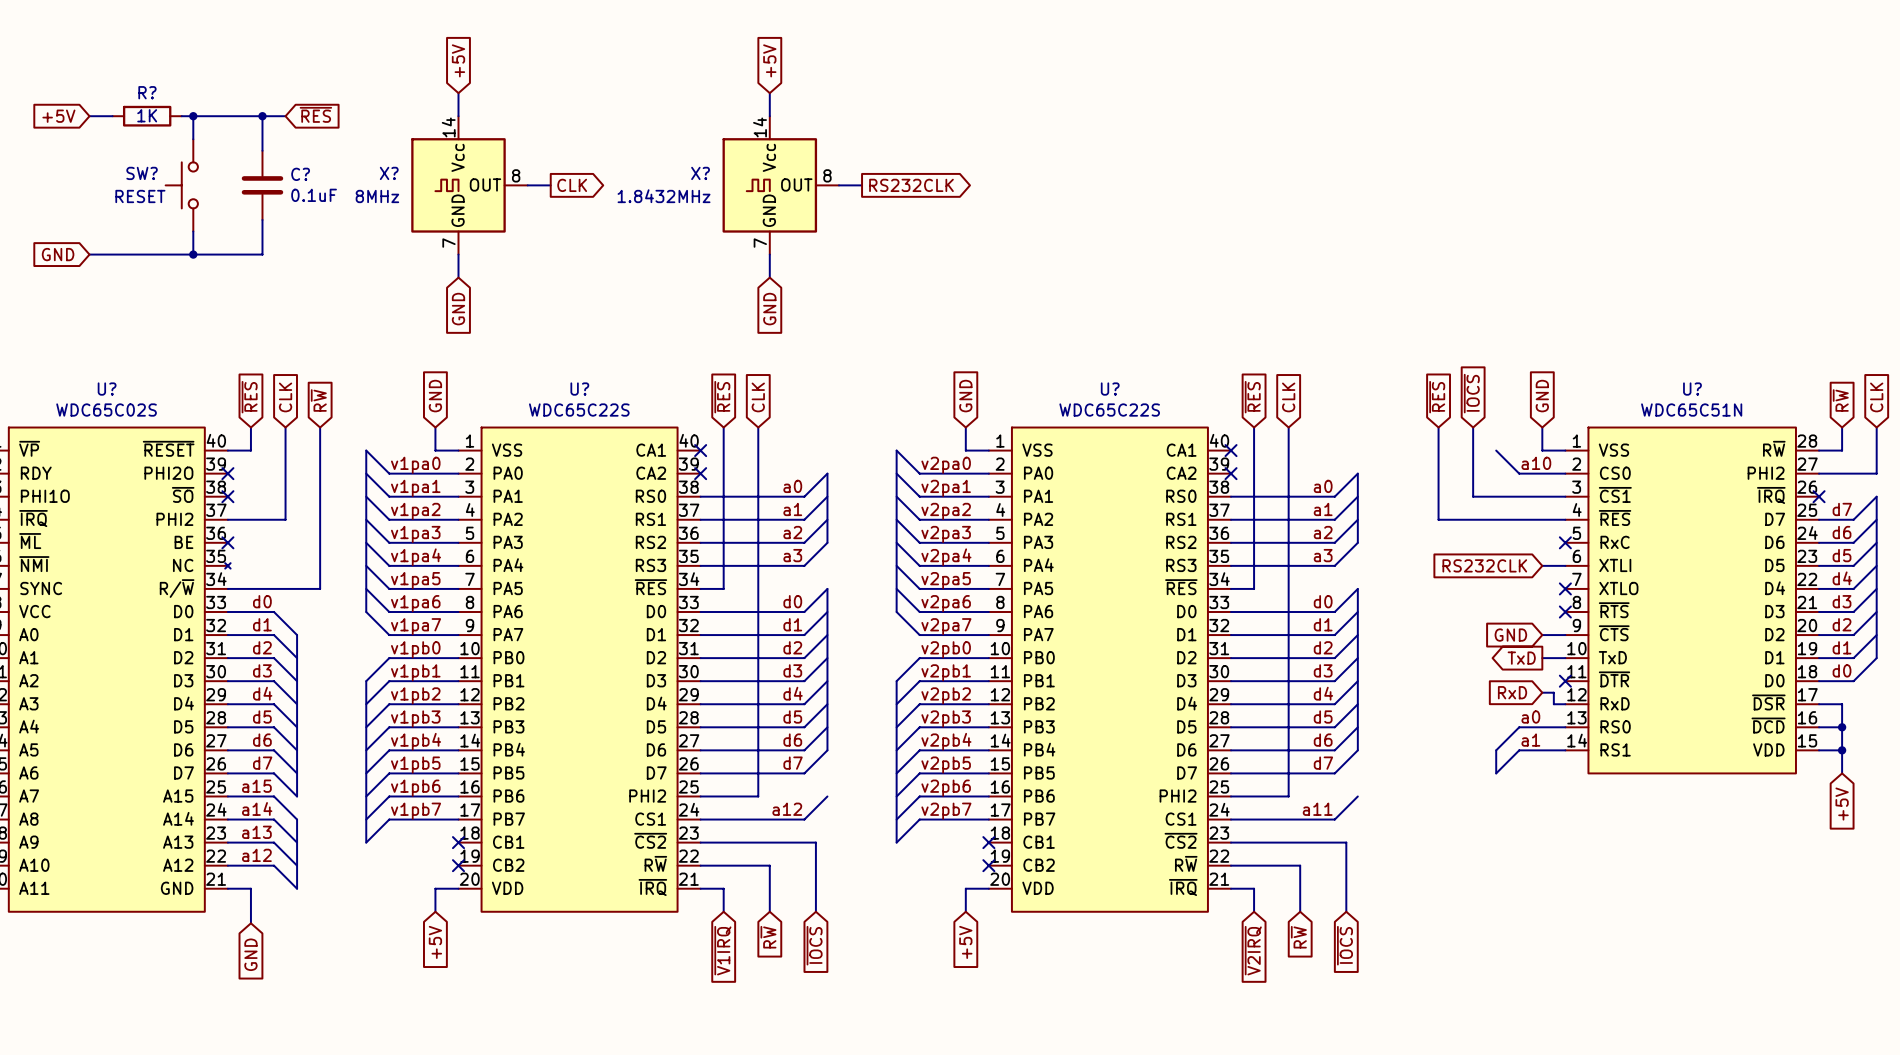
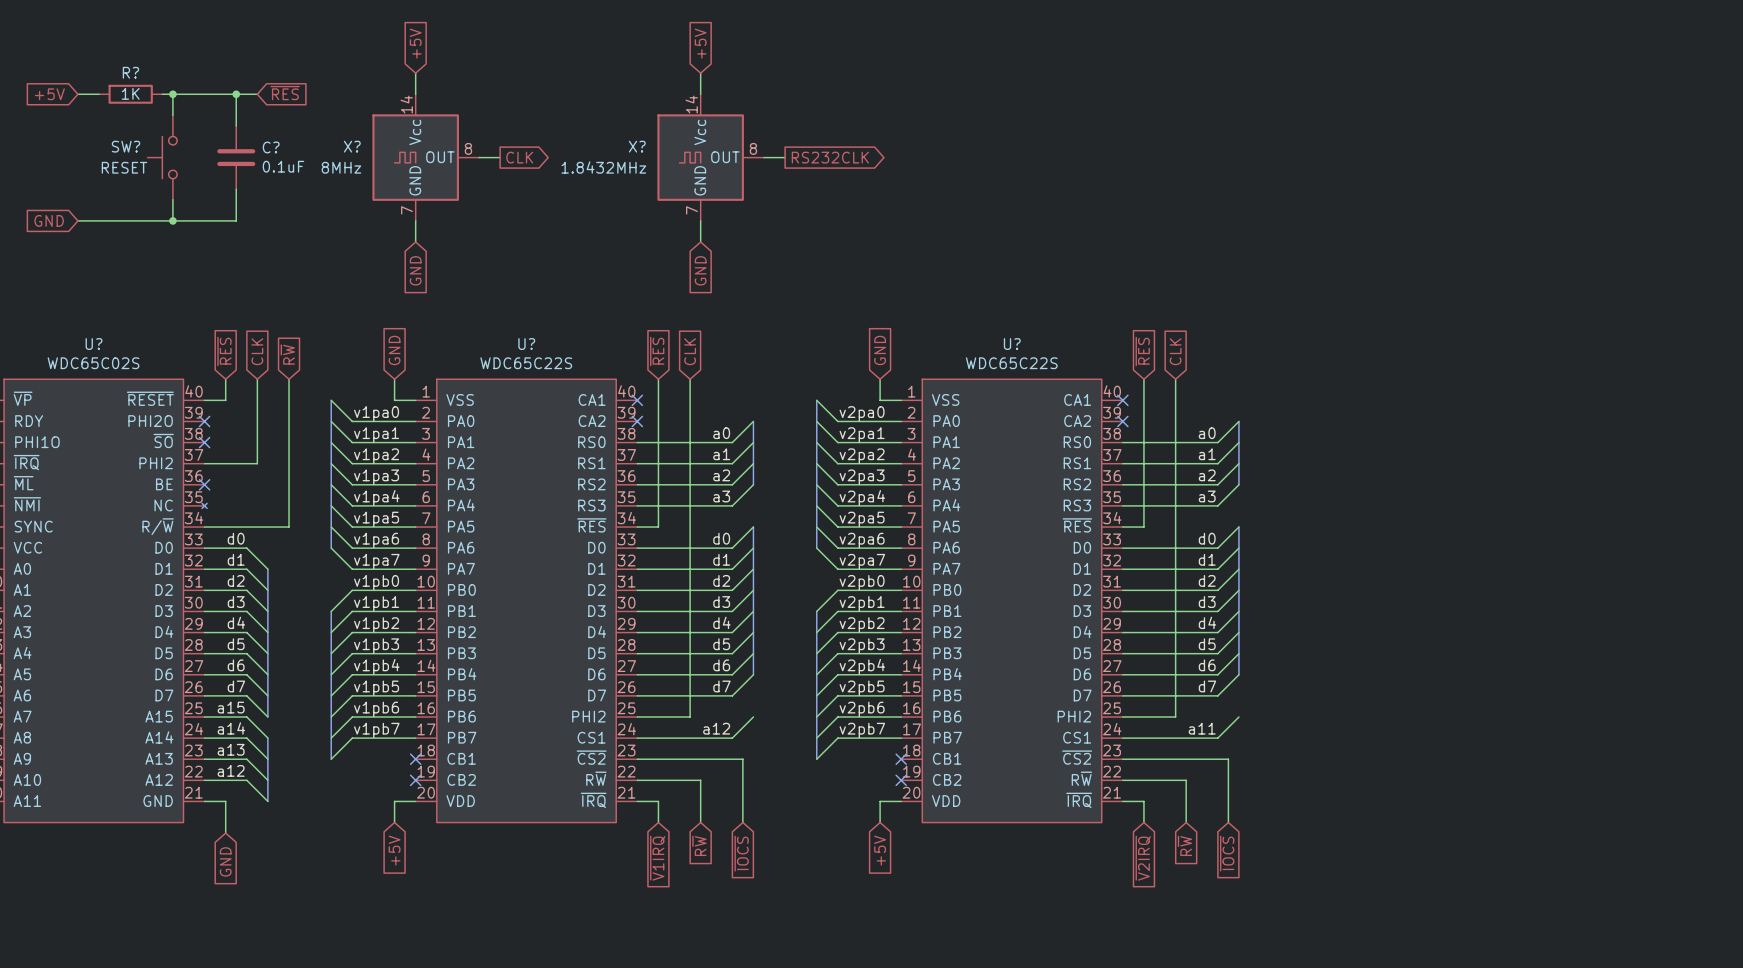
global label: ~{IOCS} (1471, 393) -> none
global label: GND (1542, 396) -> none
global label: ~{RES} (1437, 397) -> none
global label: CLK (1876, 397) -> none
global label: R~{W} (1840, 400) -> none
wire: (1438, 427) (1438, 519) (1565, 519) -> none
wire: (1473, 427) (1473, 496) (1565, 496) -> none
wire: (1542, 427) (1542, 450) (1565, 450) -> none
wire: (1842, 427) (1842, 450) (1819, 450) -> none
wire: (1876, 427) (1876, 473) (1819, 473) -> none
wire: (1496, 450) (1519, 473) (1565, 473) -> none
label: a10 (1536, 463) -> none
no-connect mark: (1819, 496) -> none
wire: (1876, 496) (1853, 519) (1819, 519) -> none
bus: (1876, 496) (1876, 658) -> none
label: d7 (1842, 509) -> none
wire: (1876, 519) (1853, 542) (1819, 542) -> none
label: d6 (1842, 532) -> none
no-connect mark: (1565, 542) -> none
wire: (1876, 542) (1853, 565) (1819, 565) -> none
label: d5 (1842, 555) -> none
global label: RS232CLK (1484, 565) -> none
wire: (1542, 565) (1565, 565) -> none
wire: (1876, 565) (1853, 588) (1819, 588) -> none
label: d4 (1842, 578) -> none
no-connect mark: (1565, 588) -> none
wire: (1876, 588) (1853, 611) (1819, 611) -> none
U?: WDC65C51N (1692, 600) -> none
label: d3 (1842, 601) -> none
no-connect mark: (1565, 611) -> none
wire: (1876, 611) (1853, 635) (1819, 635) -> none
label: d2 (1842, 624) -> none
global label: GND (1510, 635) -> none
wire: (1542, 635) (1565, 635) -> none
wire: (1876, 635) (1853, 658) (1819, 658) -> none
label: d1 (1842, 647) -> none
global label: TxD (1521, 658) -> none
wire: (1542, 658) (1565, 658) -> none
wire: (1876, 658) (1853, 681) (1819, 681) -> none
label: d0 (1842, 670) -> none
no-connect mark: (1565, 681) -> none
global label: RxD (1512, 692) -> none
wire: (1542, 692) (1553, 692) (1553, 704) (1565, 704) -> none
wire: (1819, 704) (1842, 704) (1842, 773) -> none
label: a0 (1530, 717) -> none
wire: (1565, 727) (1519, 727) (1496, 750) -> none
wire: (1819, 727) (1842, 727) -> none
junction: (1842, 727) -> none
label: a1 (1530, 740) -> none
bus: (1496, 750) (1496, 773) -> none
wire: (1565, 750) (1519, 750) (1496, 773) -> none
wire: (1819, 750) (1842, 750) -> none
junction: (1842, 750) -> none
global label: +5V (1842, 804) -> none

